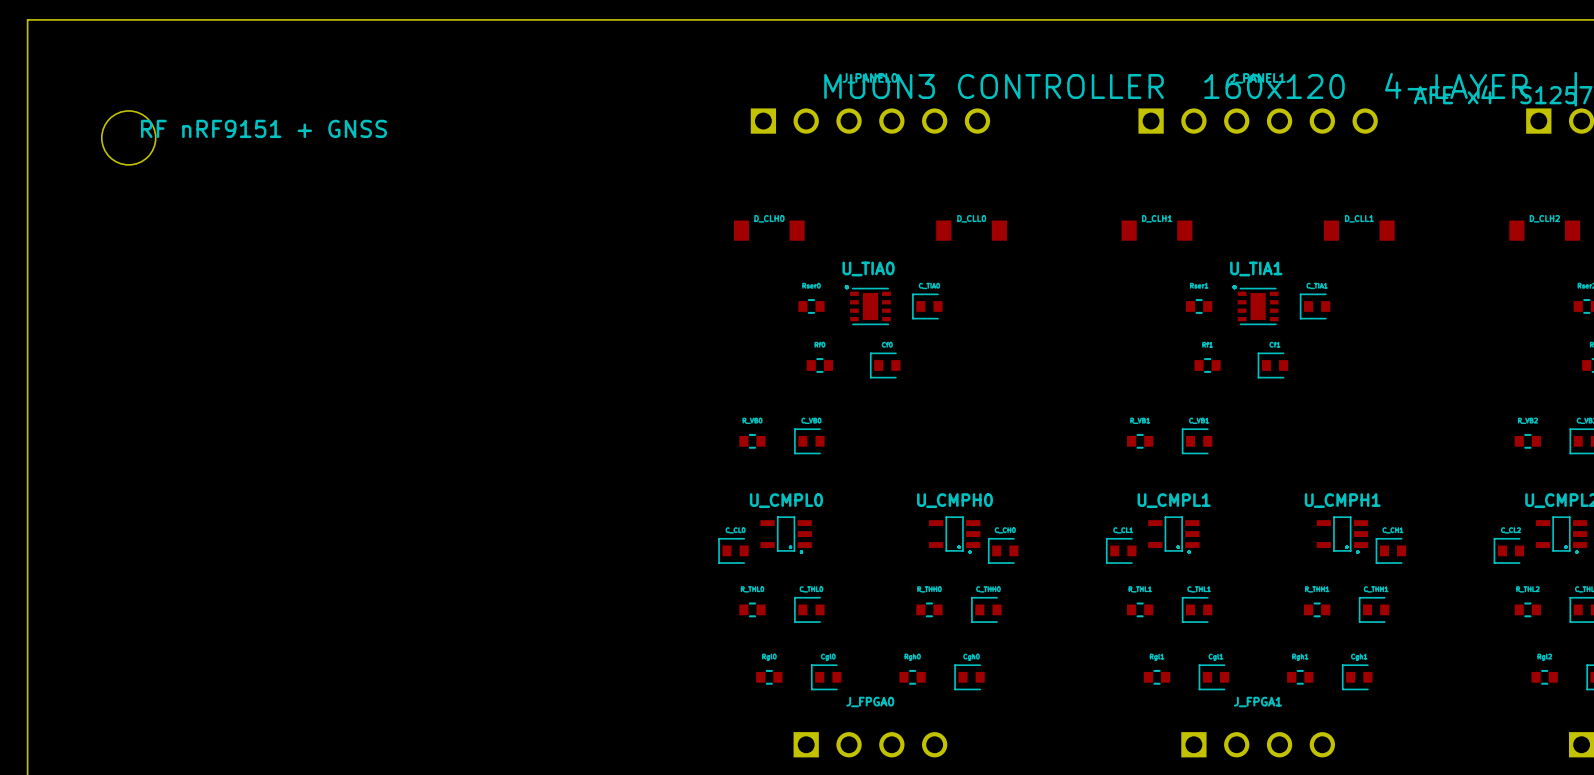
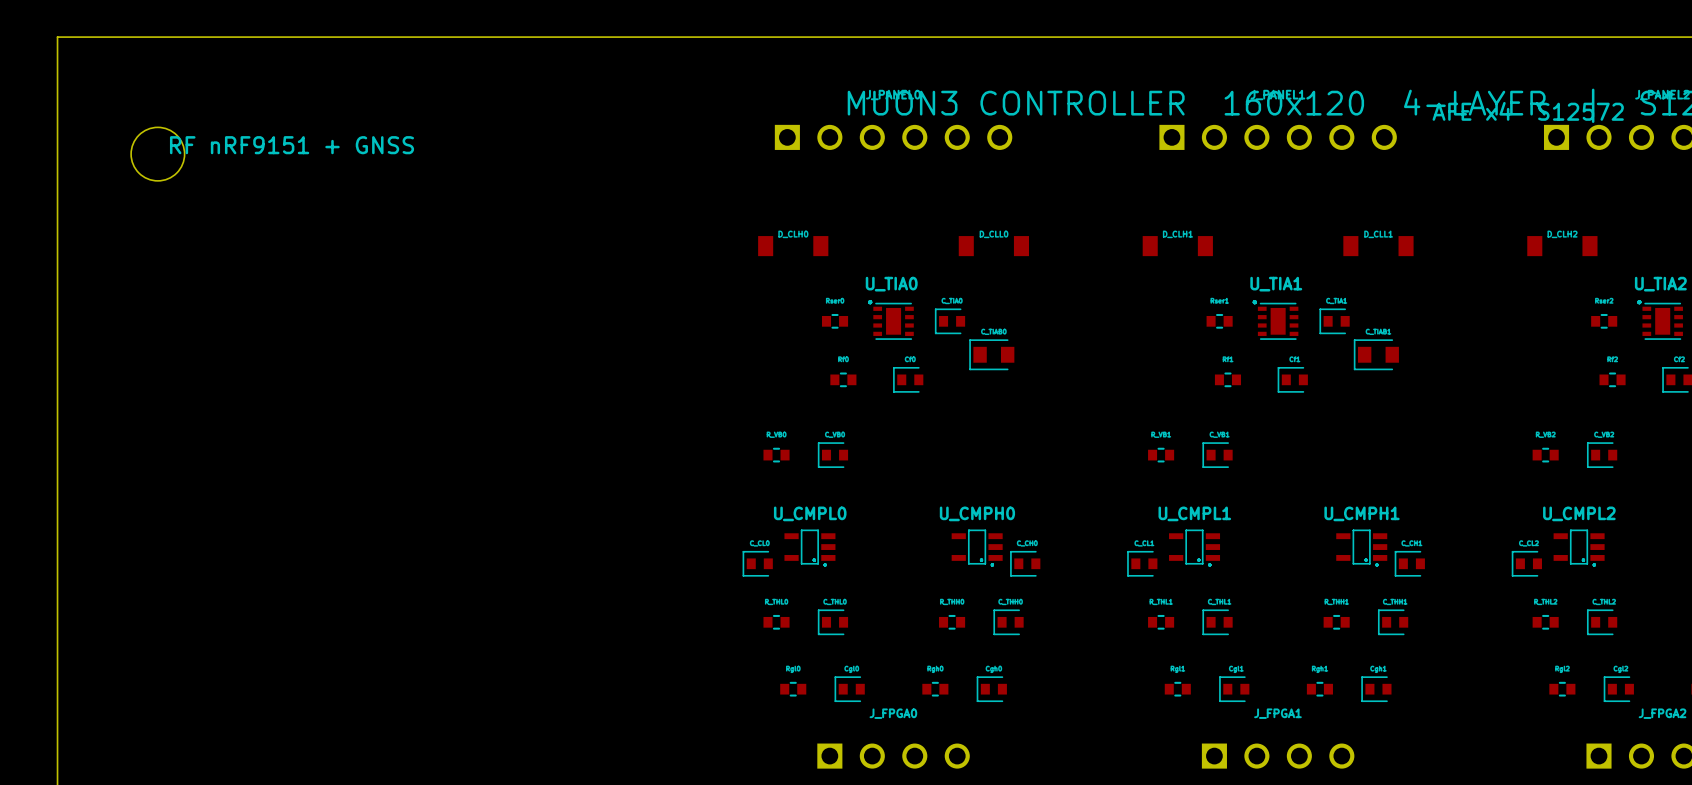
part: none -> (991, 354)
part: none -> (1376, 354)

